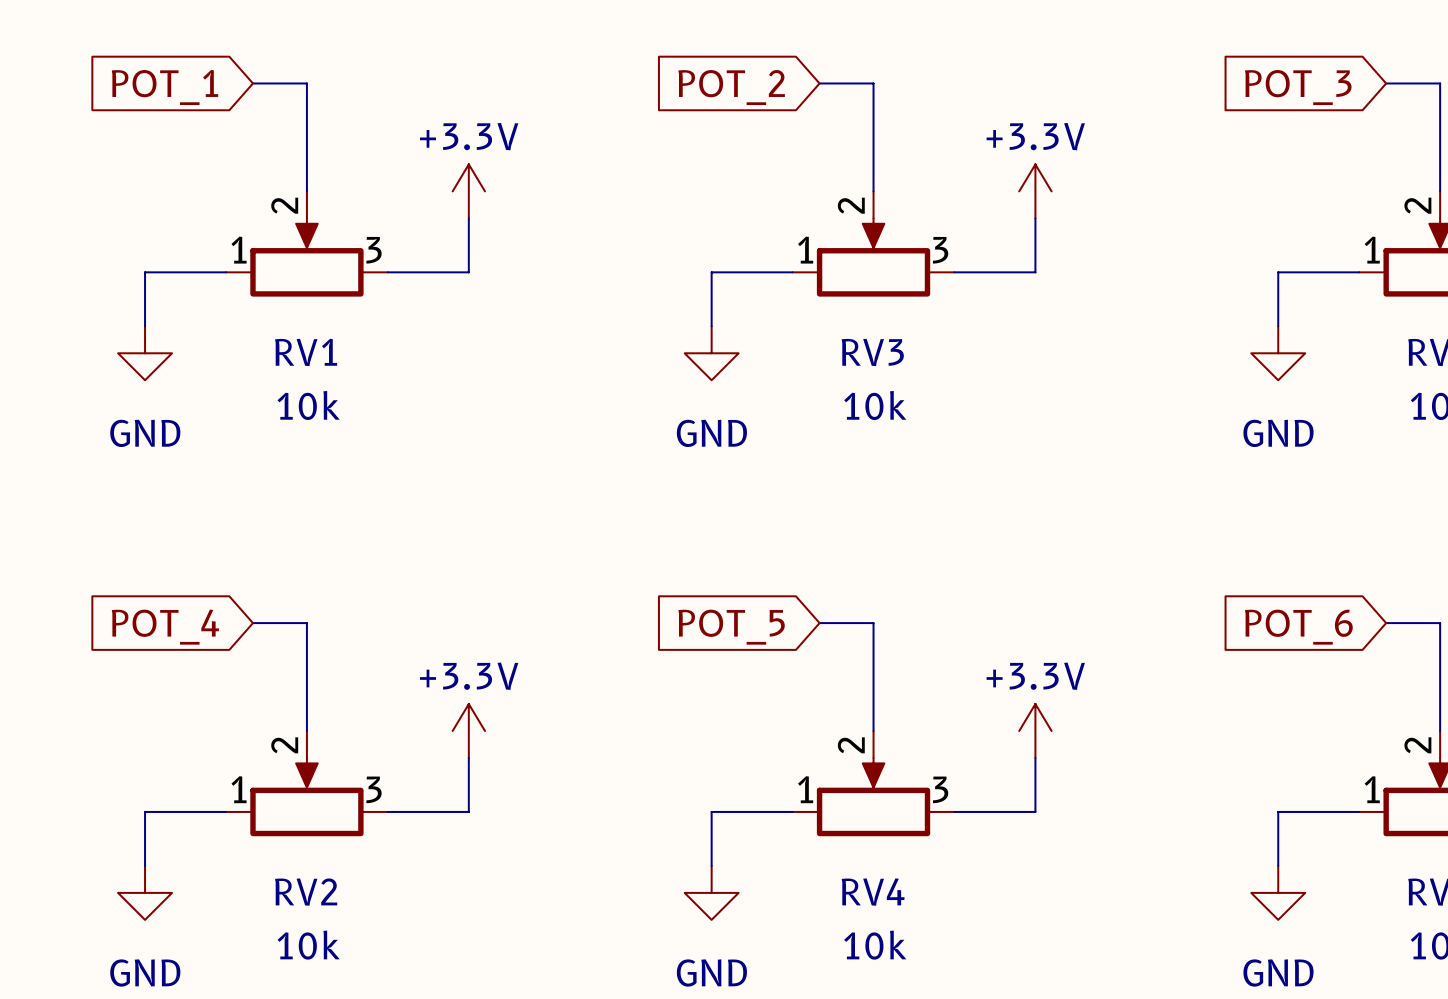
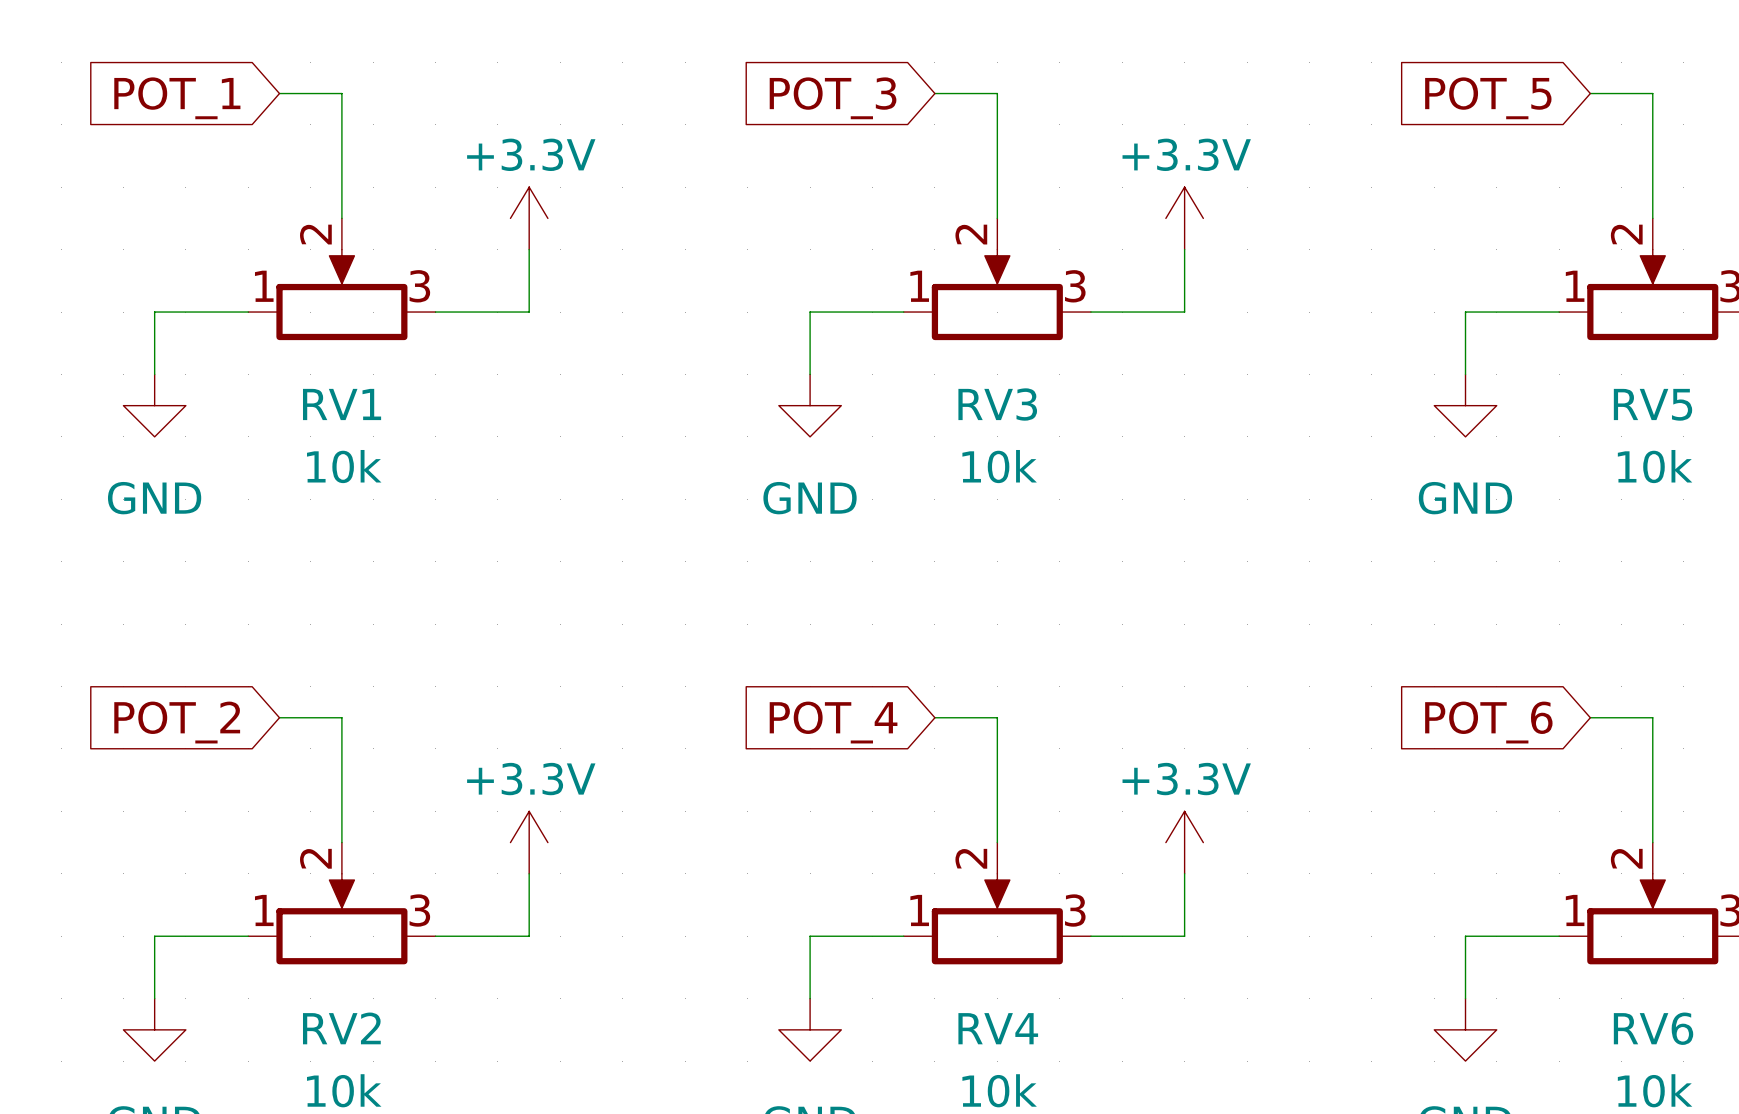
global label: POT_2 (731, 87) -> POT_3 (833, 98)
global label: POT_3 (1298, 87) -> POT_5 (1488, 98)
global label: POT_4 (165, 627) -> POT_2 (177, 722)
global label: POT_5 (731, 627) -> POT_4 (833, 722)

